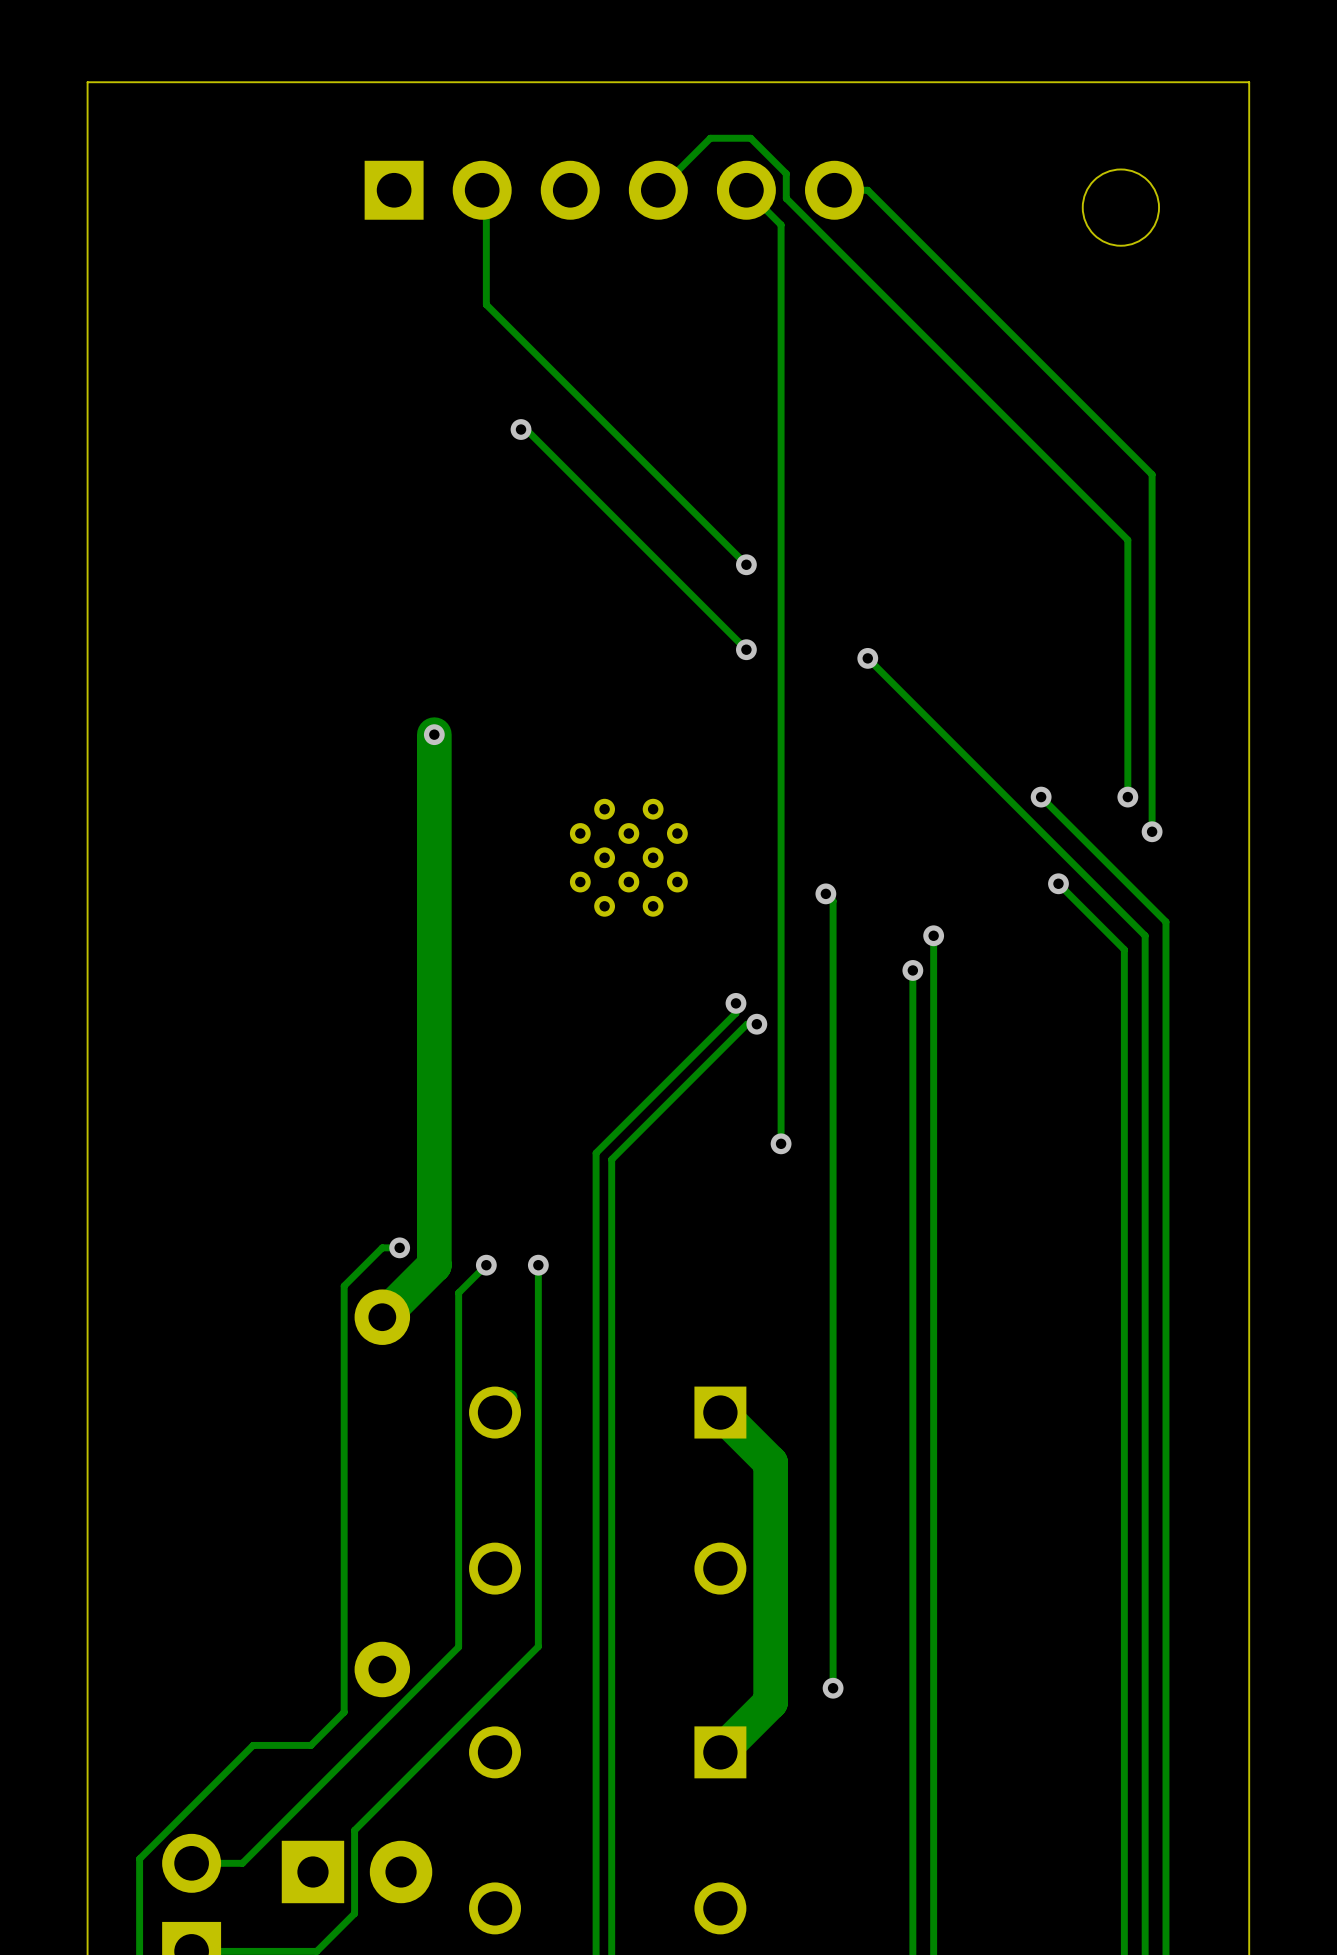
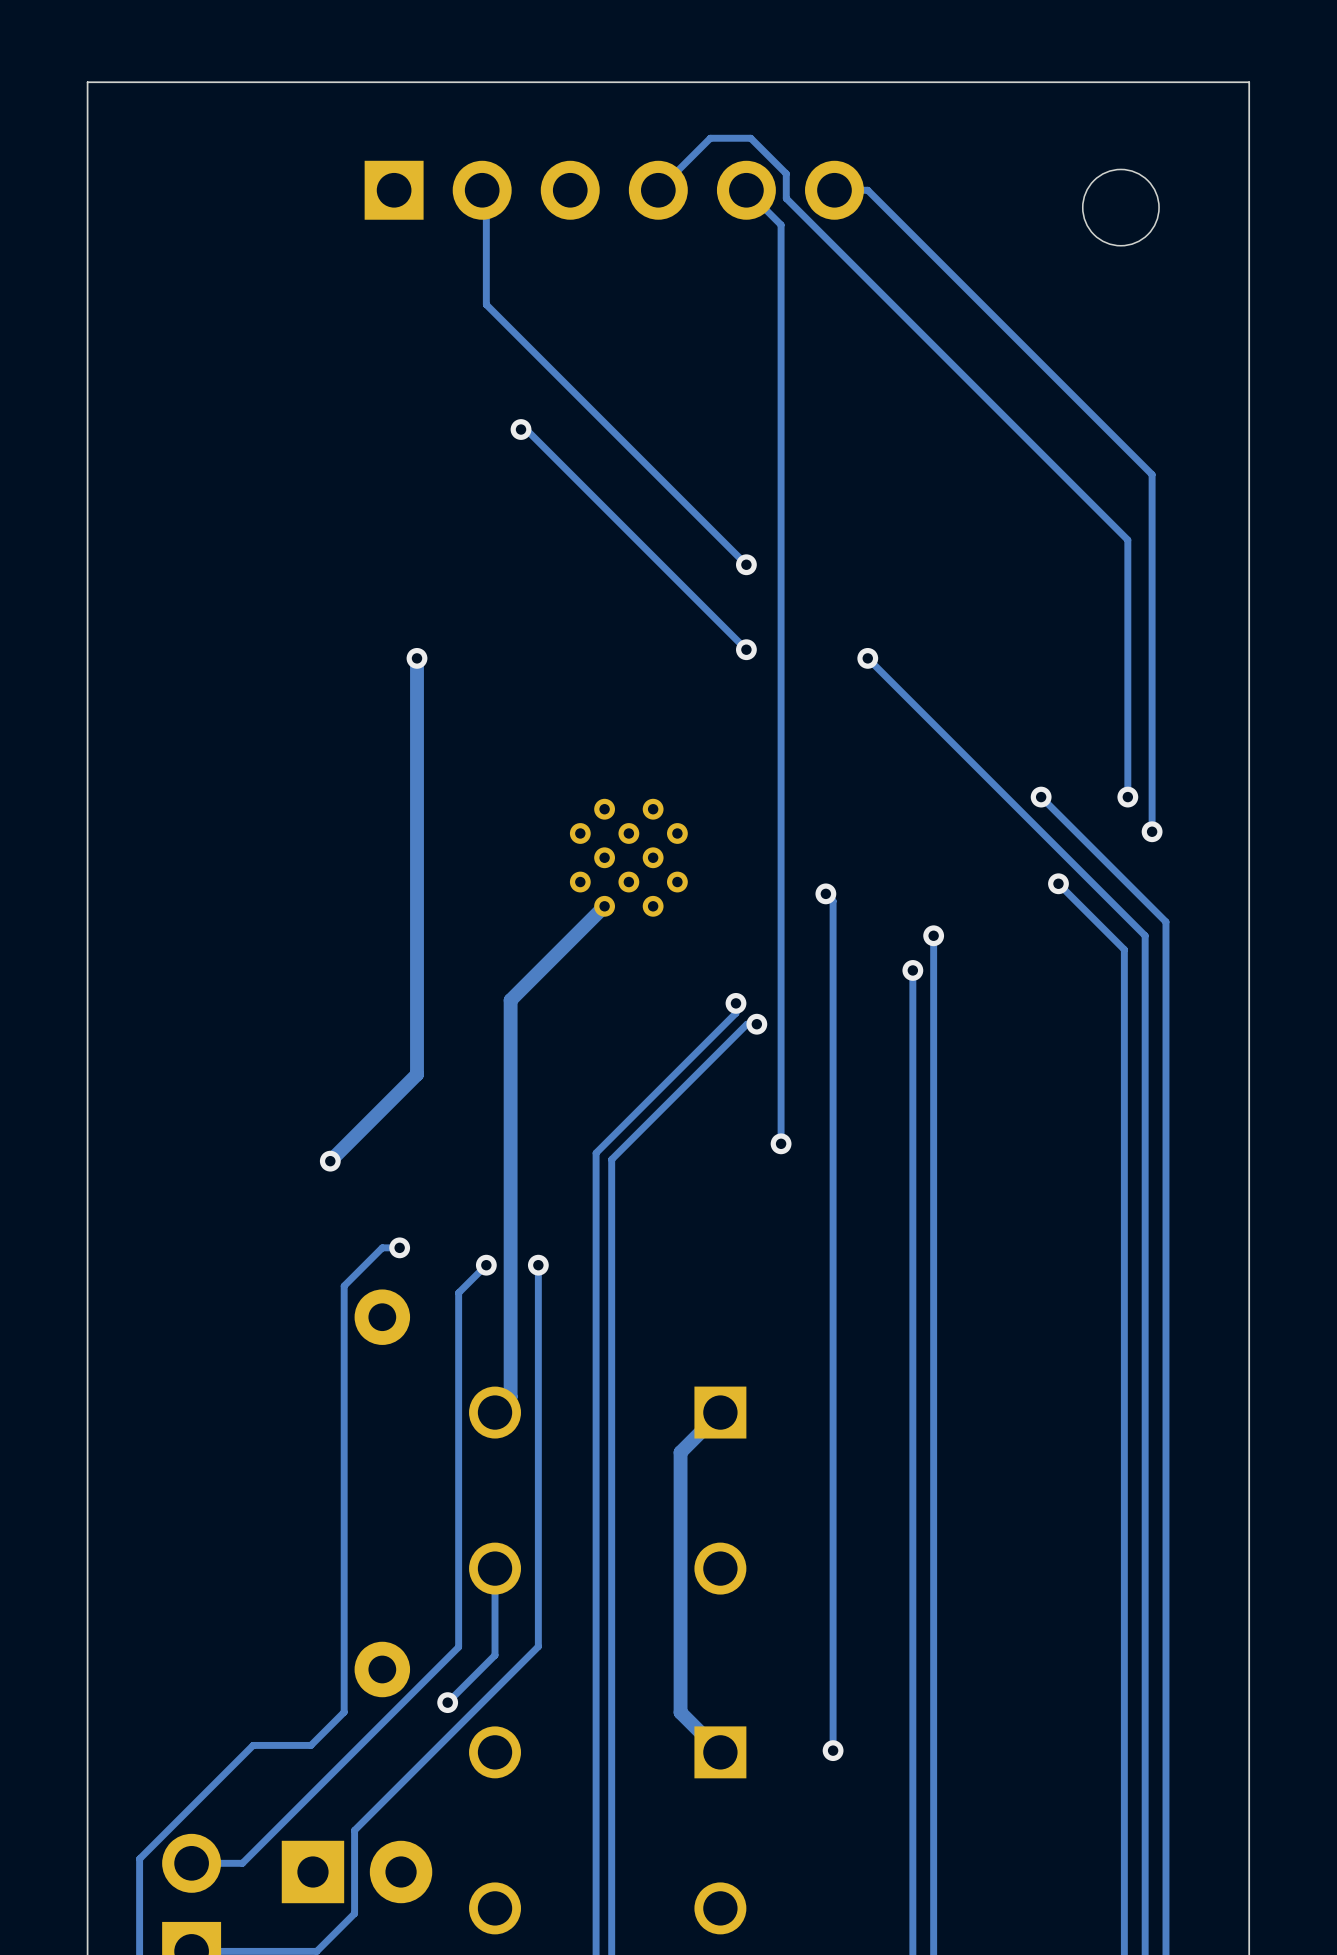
track: none -> (417, 658) (417, 1074) (330, 1161)
track: (434, 734) (434, 1265) (382, 1317) -> none
via position: (434, 734) -> (417, 658)
track: none -> (604, 906) (510, 1000) (510, 1396)
via: none -> (330, 1161)
track: (720, 1412) (770, 1462) (770, 1702) (720, 1752) -> (720, 1412) (680, 1452) (680, 1712) (720, 1752)
track: none -> (495, 1568) (495, 1655) (447, 1702)
track: none -> (833, 1688) (833, 1750)
via position: (833, 1688) -> (833, 1750)
via: none -> (447, 1702)

